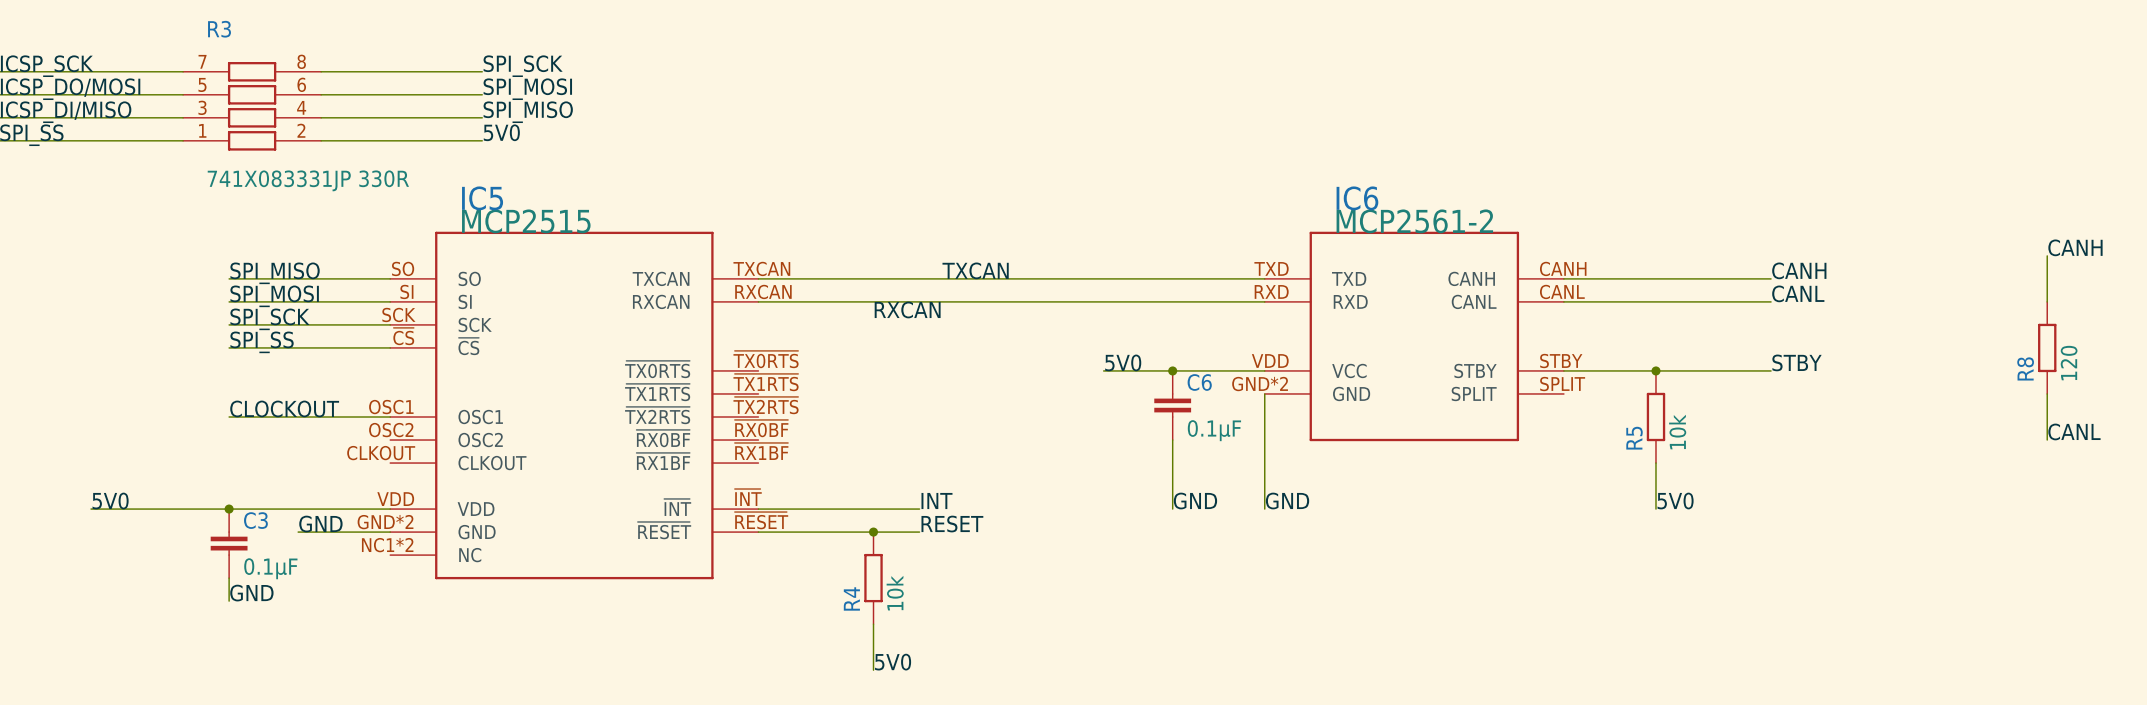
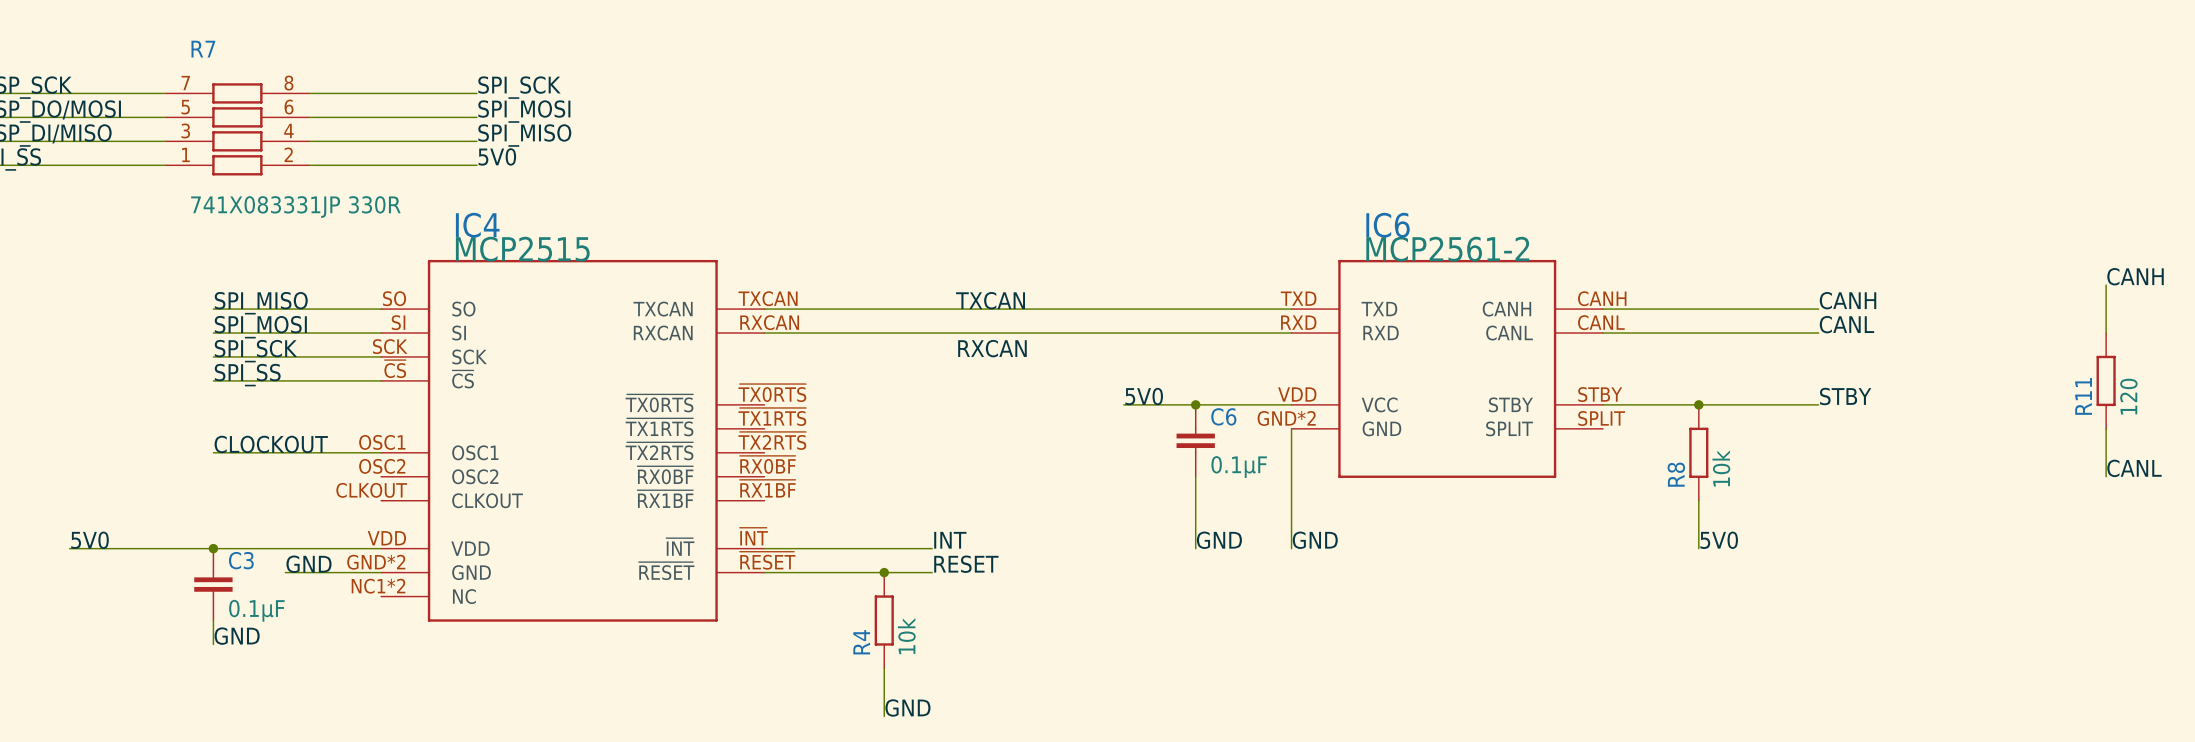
R3 name: R3 (219, 29) -> R7 (203, 49)
IC5 name: IC5 (482, 198) -> IC4 (477, 225)
label position: RXCAN (907, 309) -> RXCAN (992, 348)
R8 name: R8 (2025, 368) -> R11 (2083, 396)
R5 name: R5 (1634, 438) -> R8 (1676, 474)
label: 5V0 (893, 662) -> GND (907, 707)

